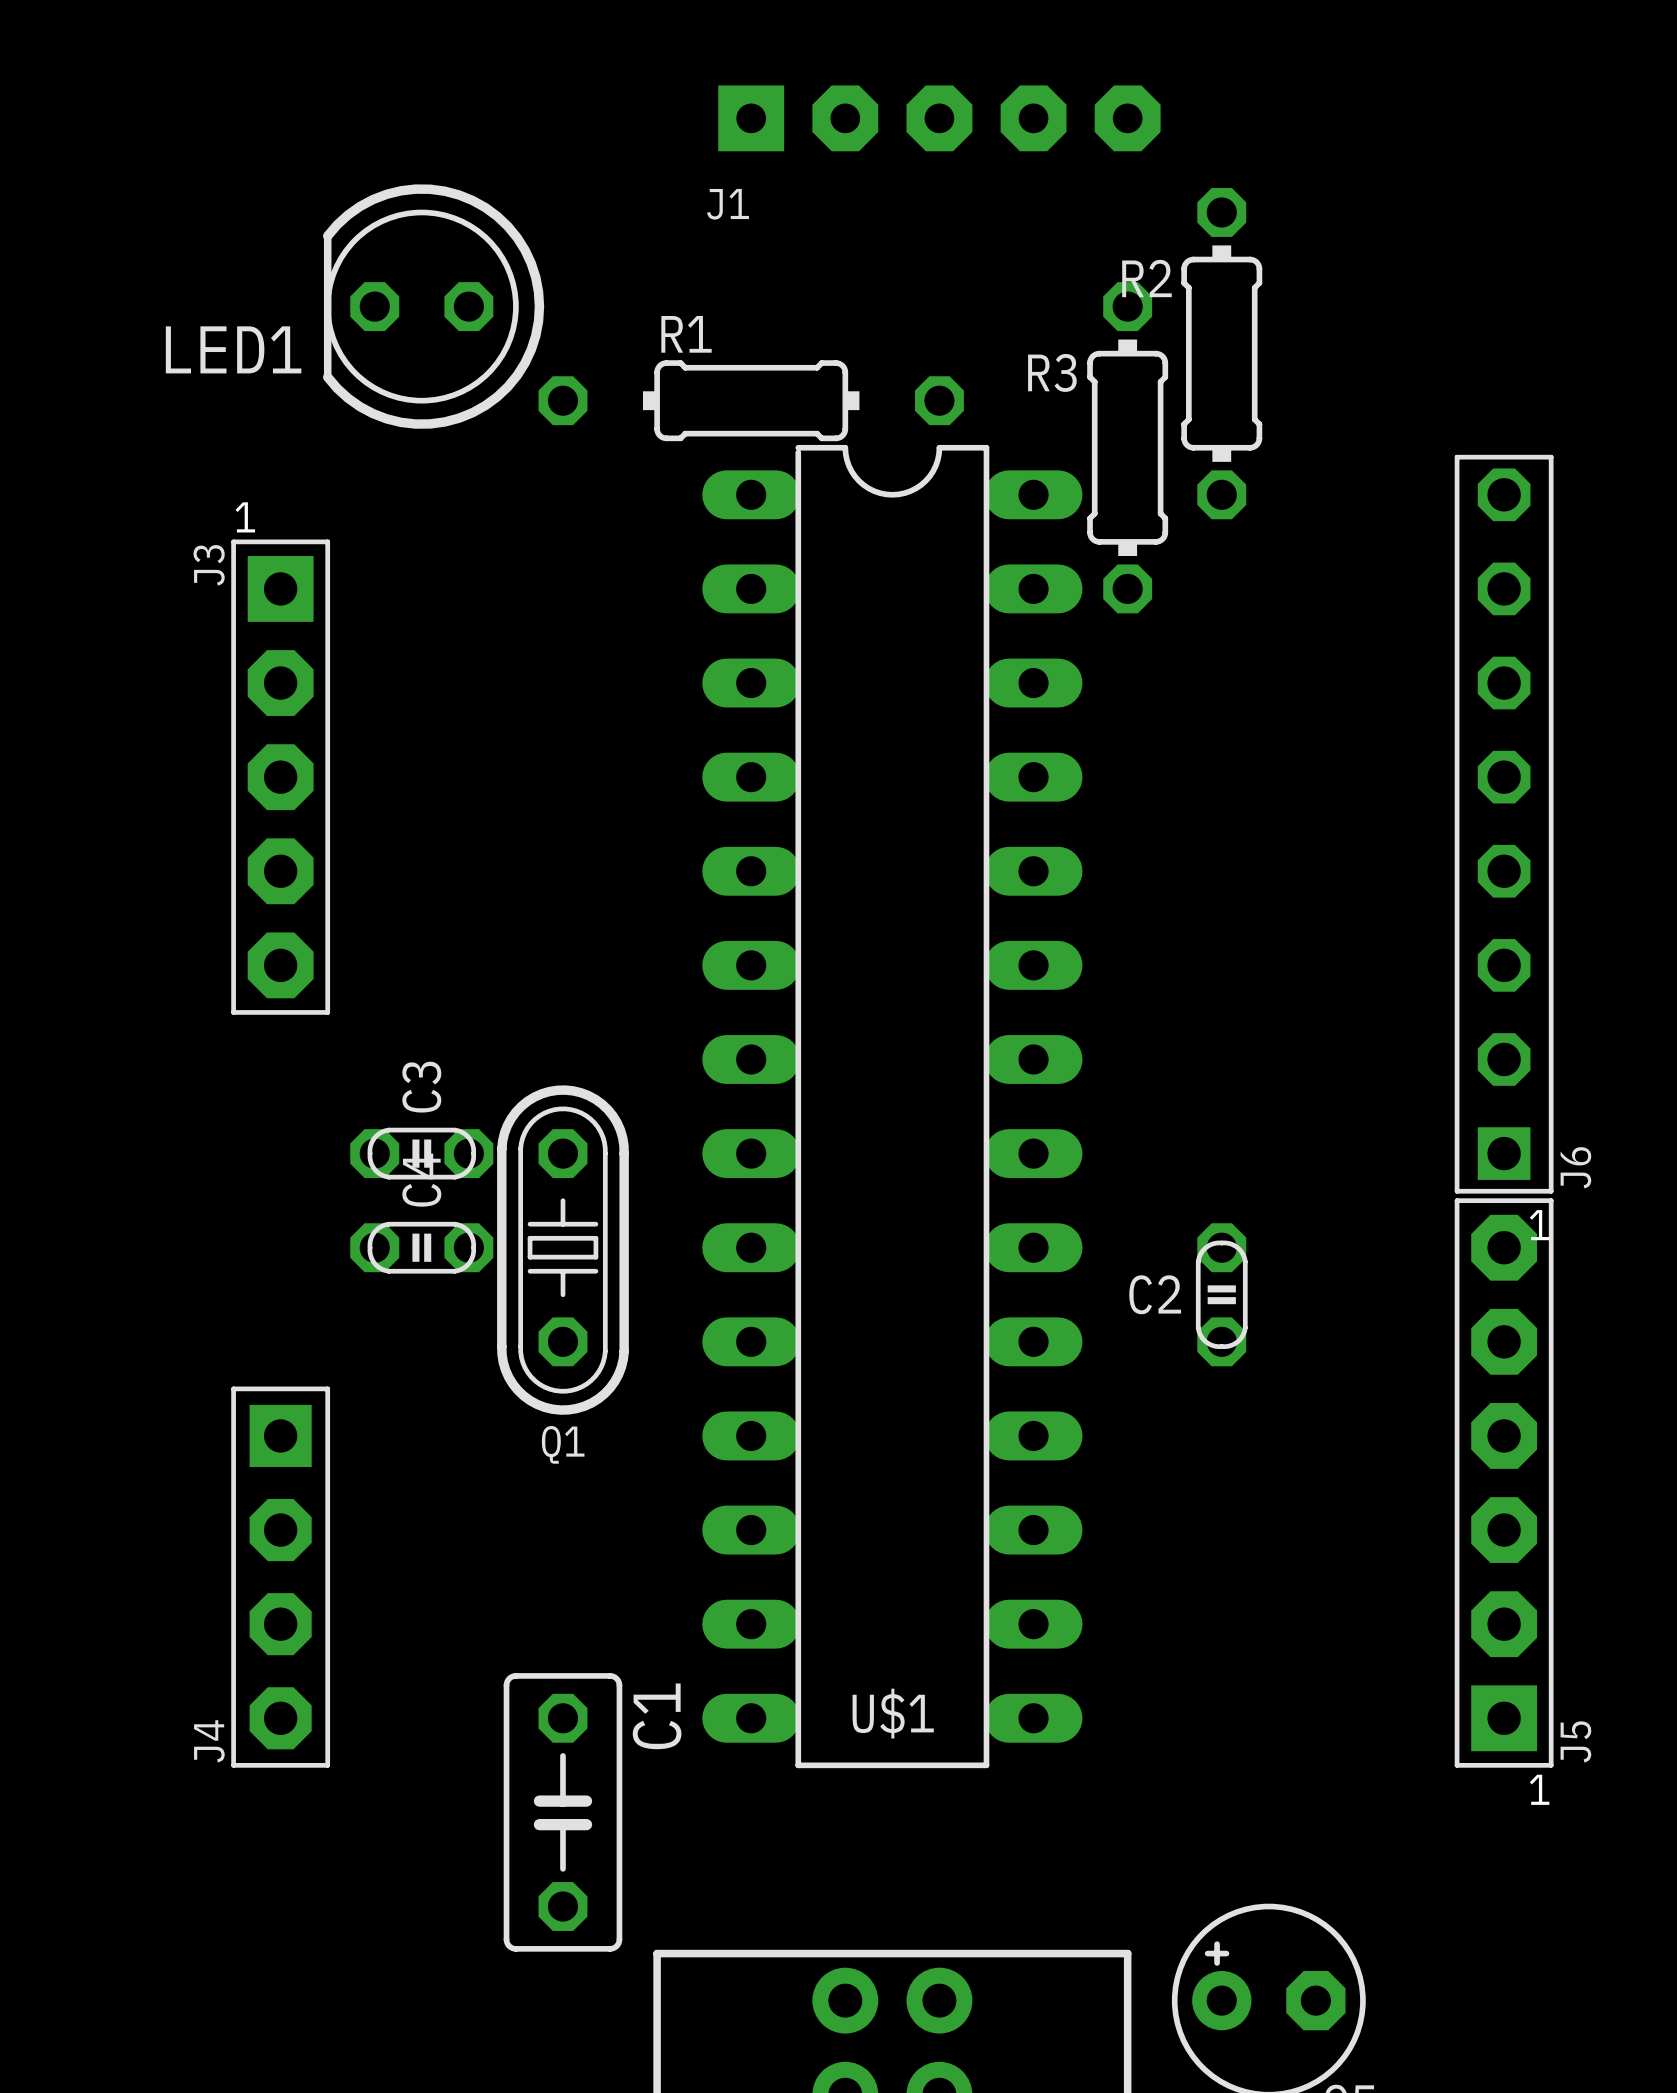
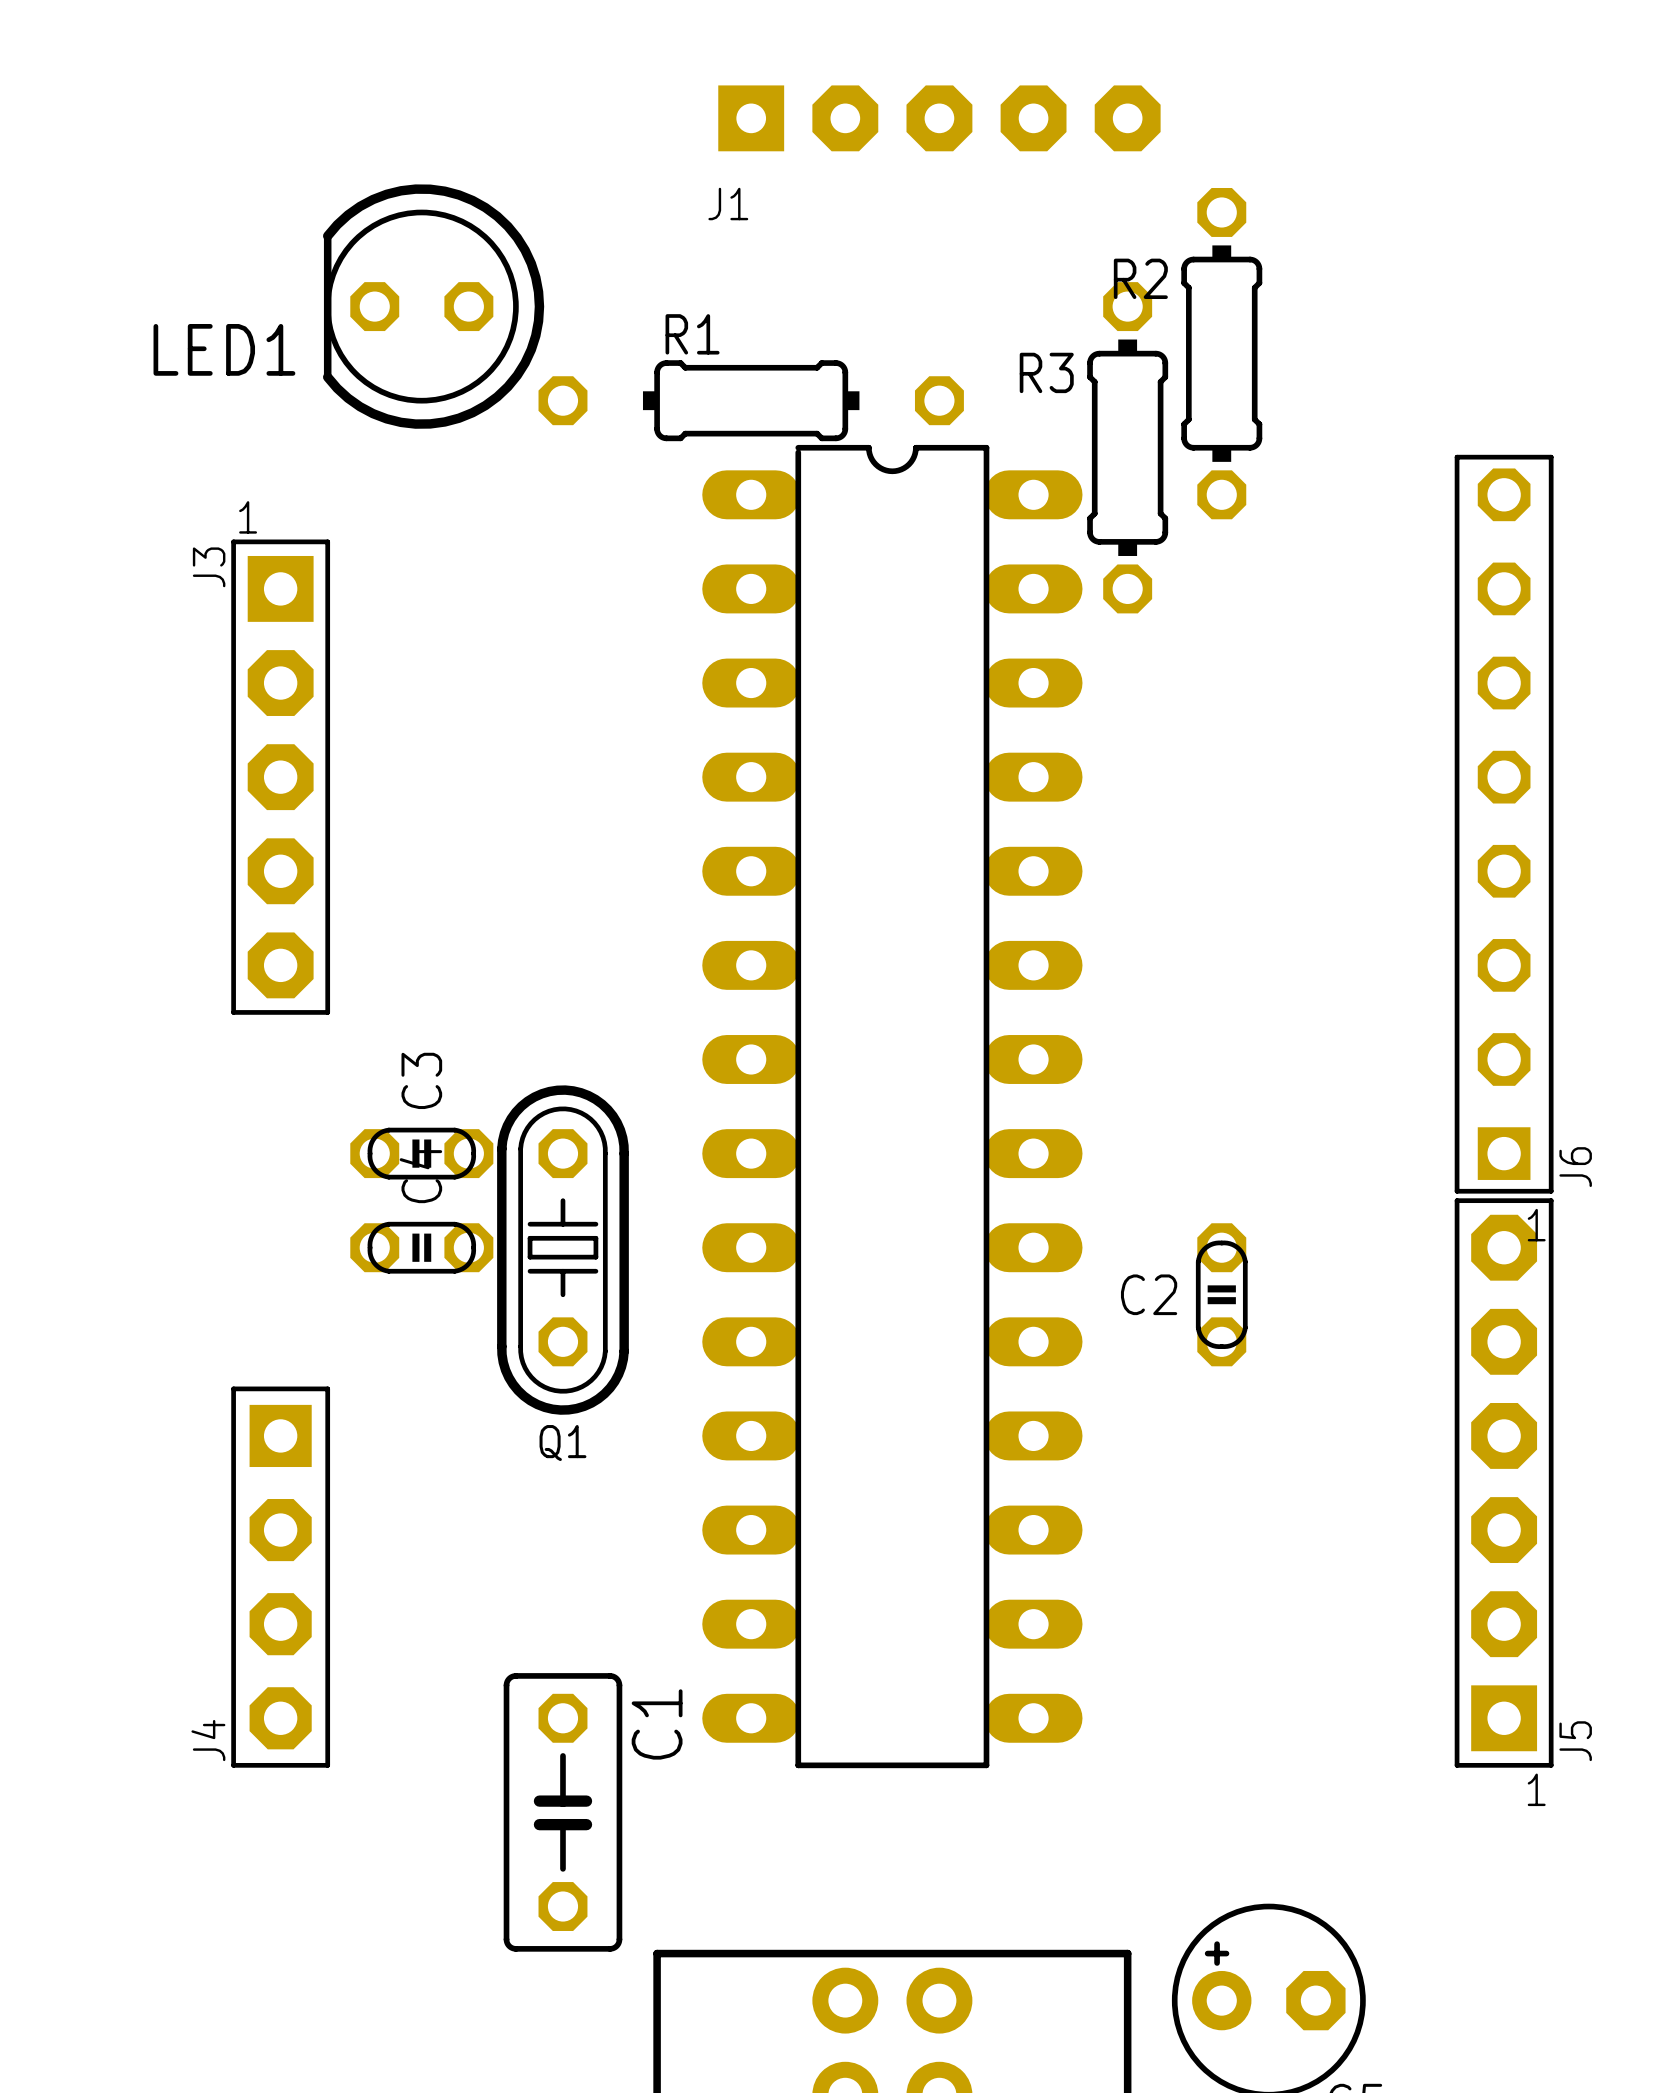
U$1: (892, 1106) -> none
part: none -> (892, 1106)

